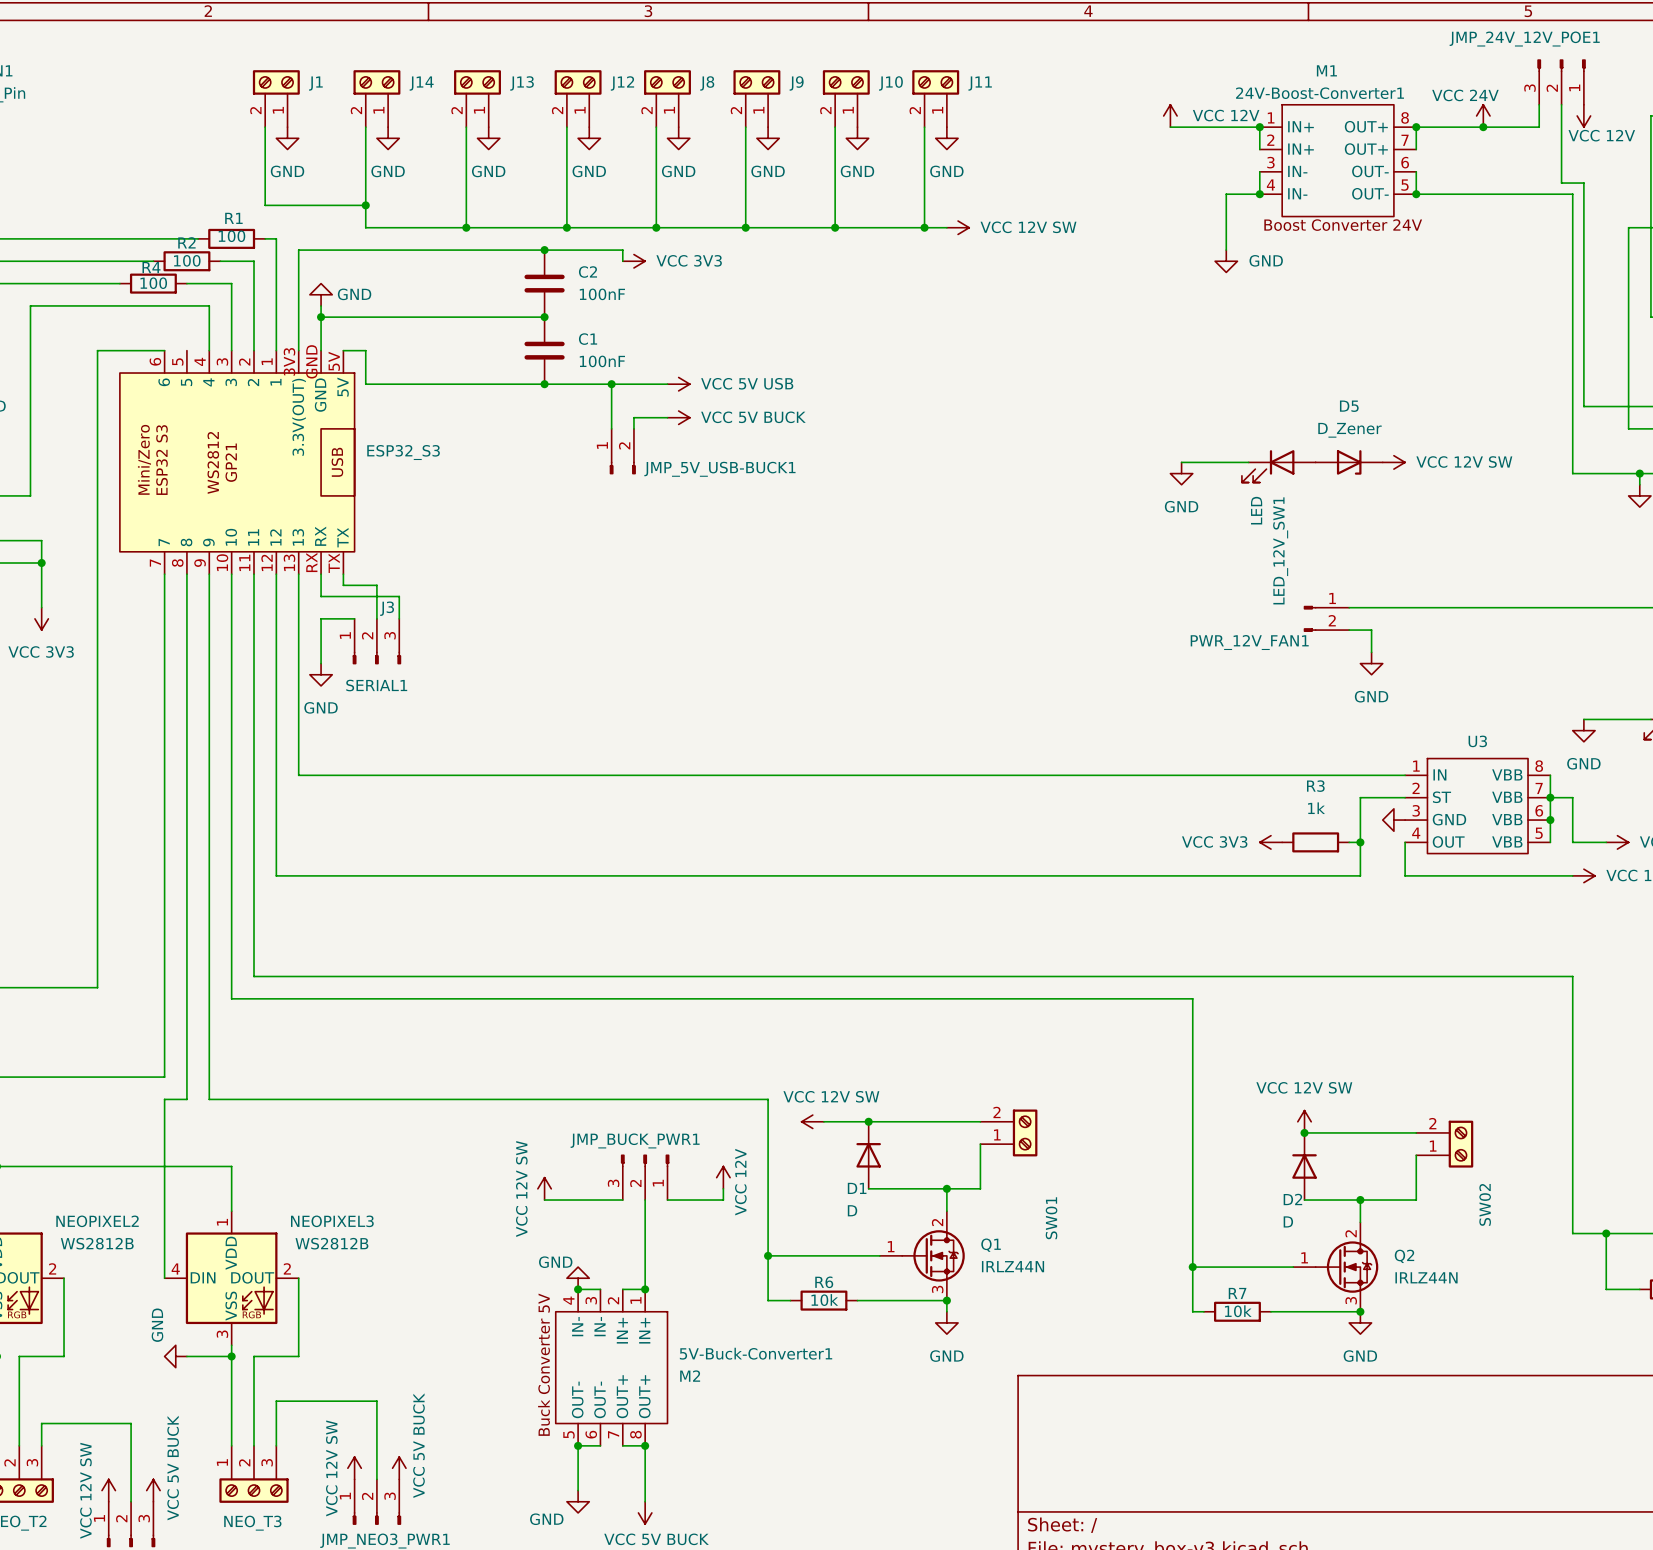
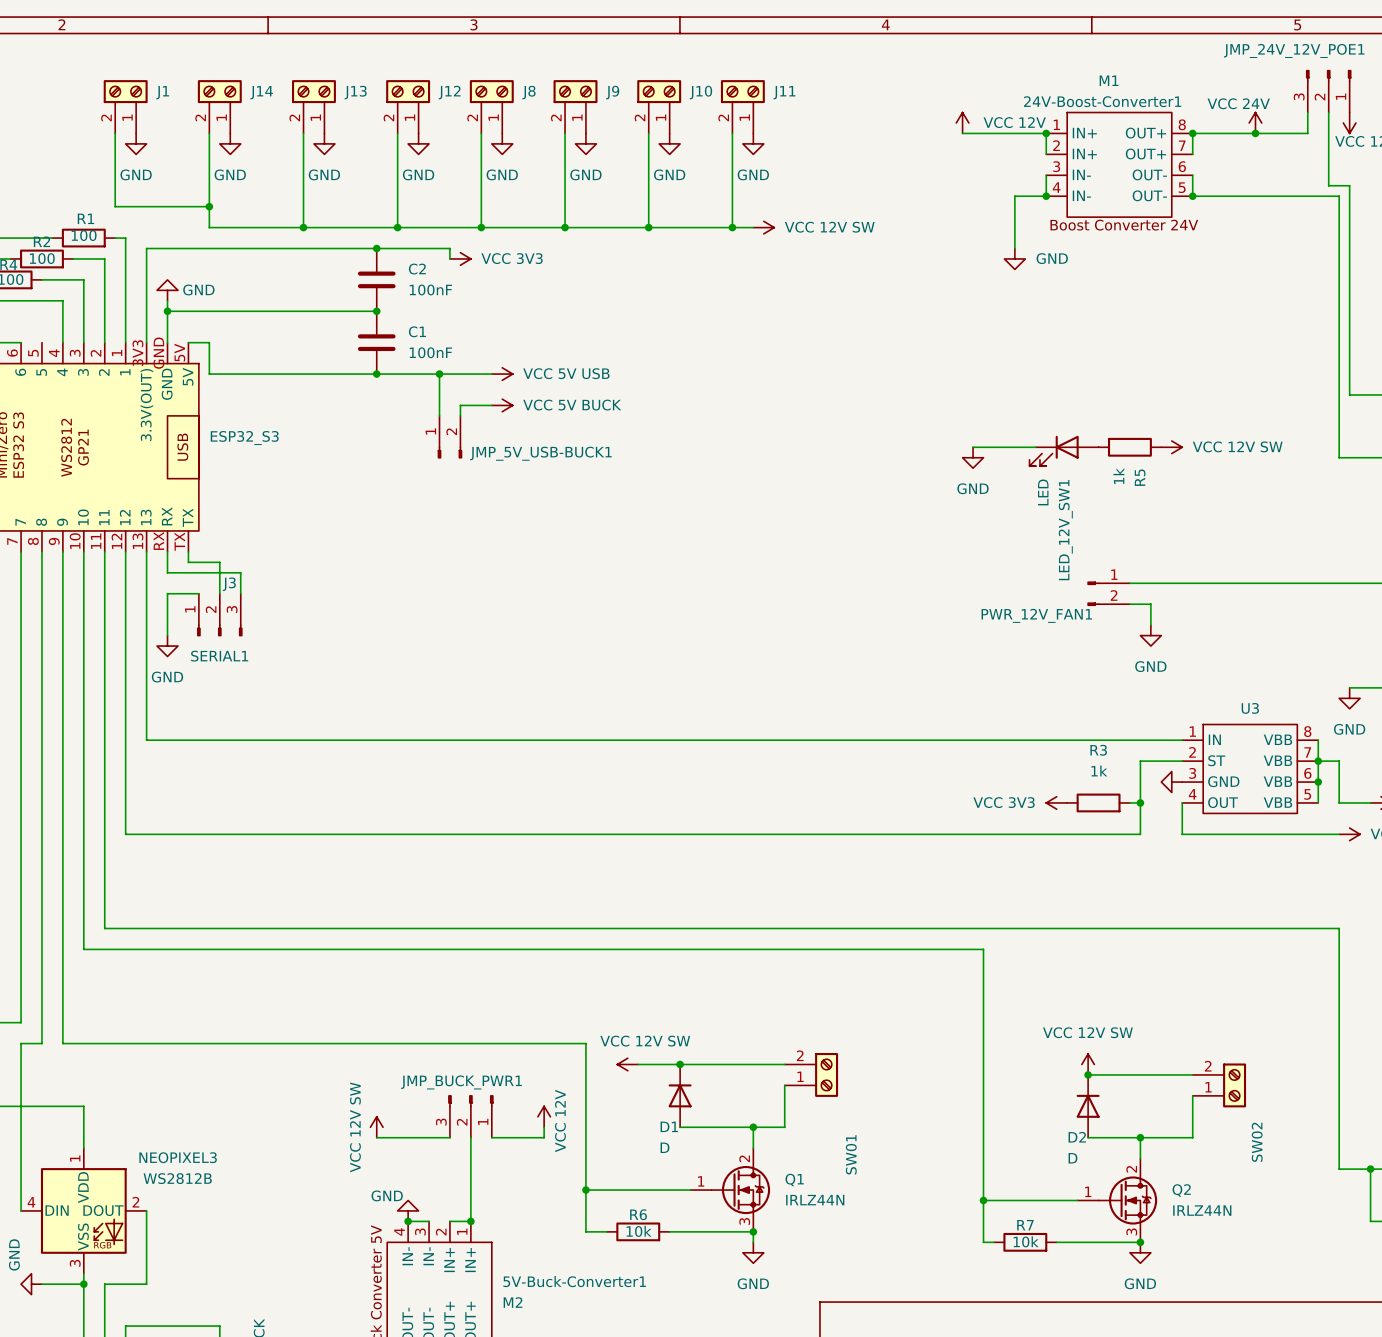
D5: D_Zener (1349, 462) -> none
R5: none -> 1k (1129, 447)

